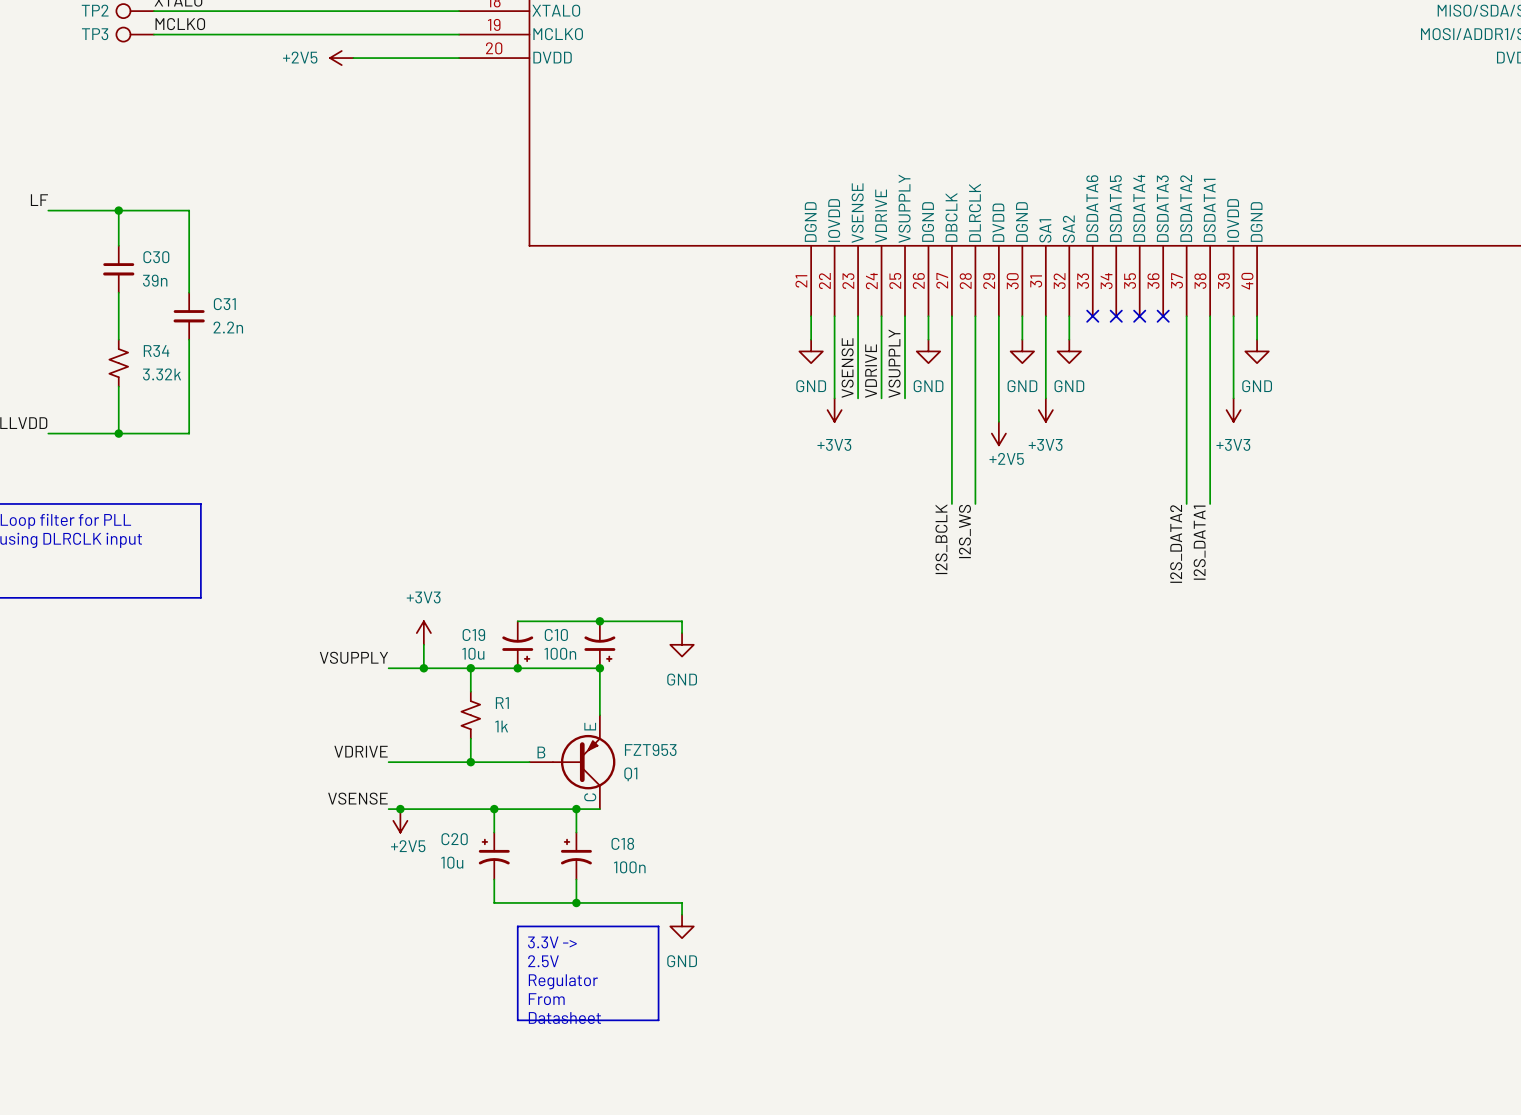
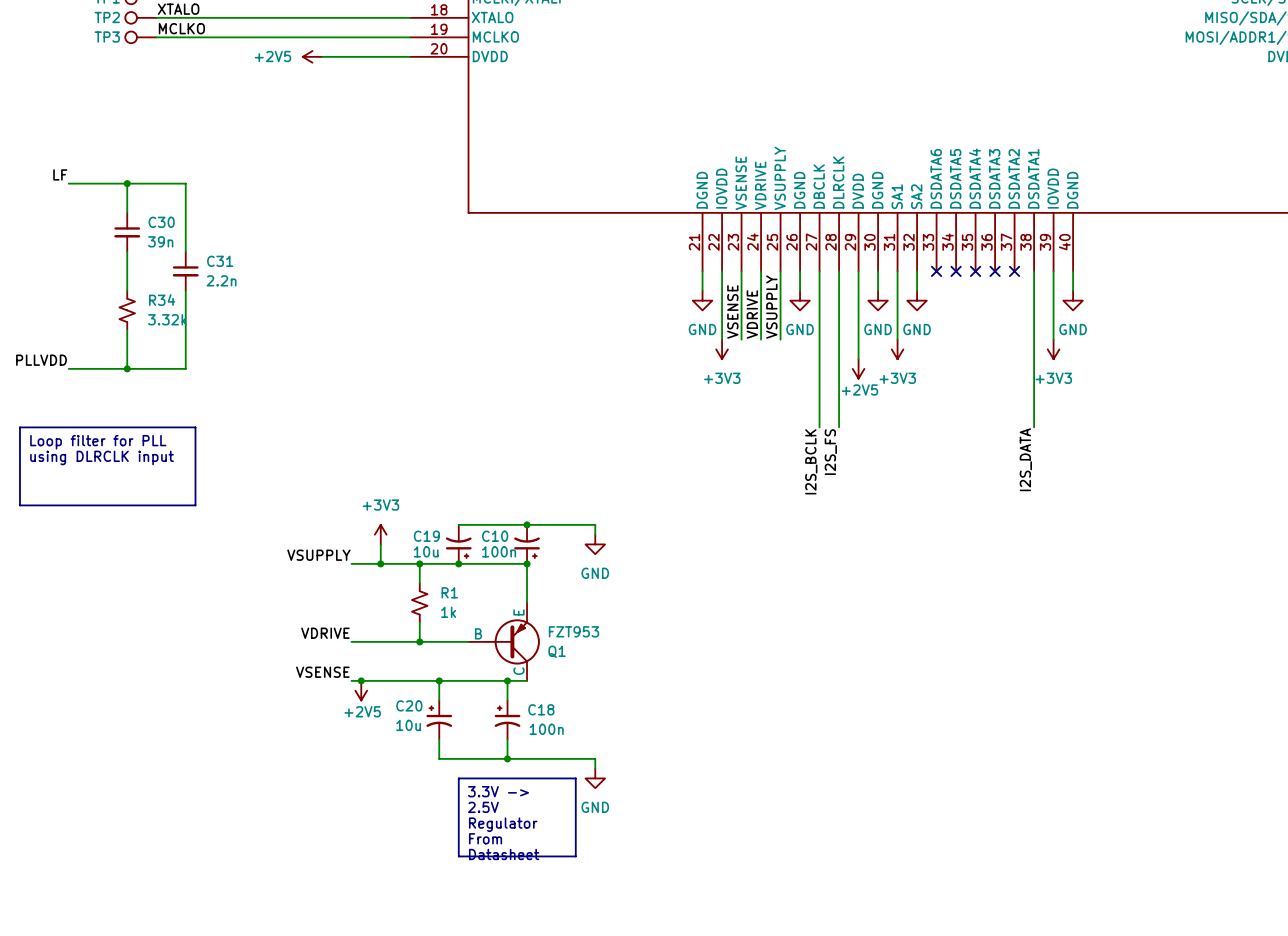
wire: (1186, 316) (1186, 503) -> none
no-connect mark: none -> (1014, 271)
label: I2S_WS (964, 531) -> I2S_FS (830, 452)
label: I2S_DATA1 (1199, 542) -> I2S_DATA (1025, 459)
label: I2S_DATA2 (1176, 543) -> none

